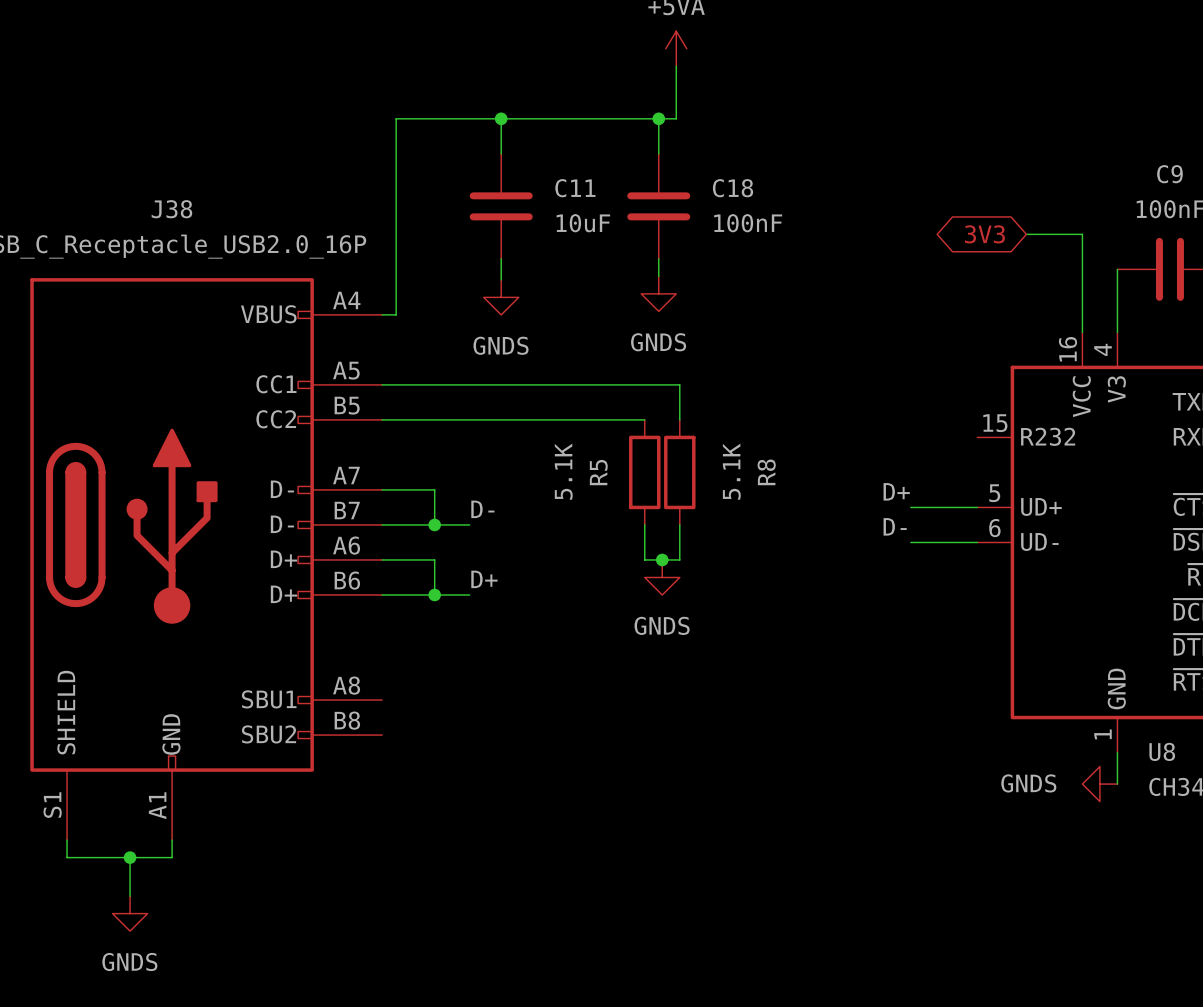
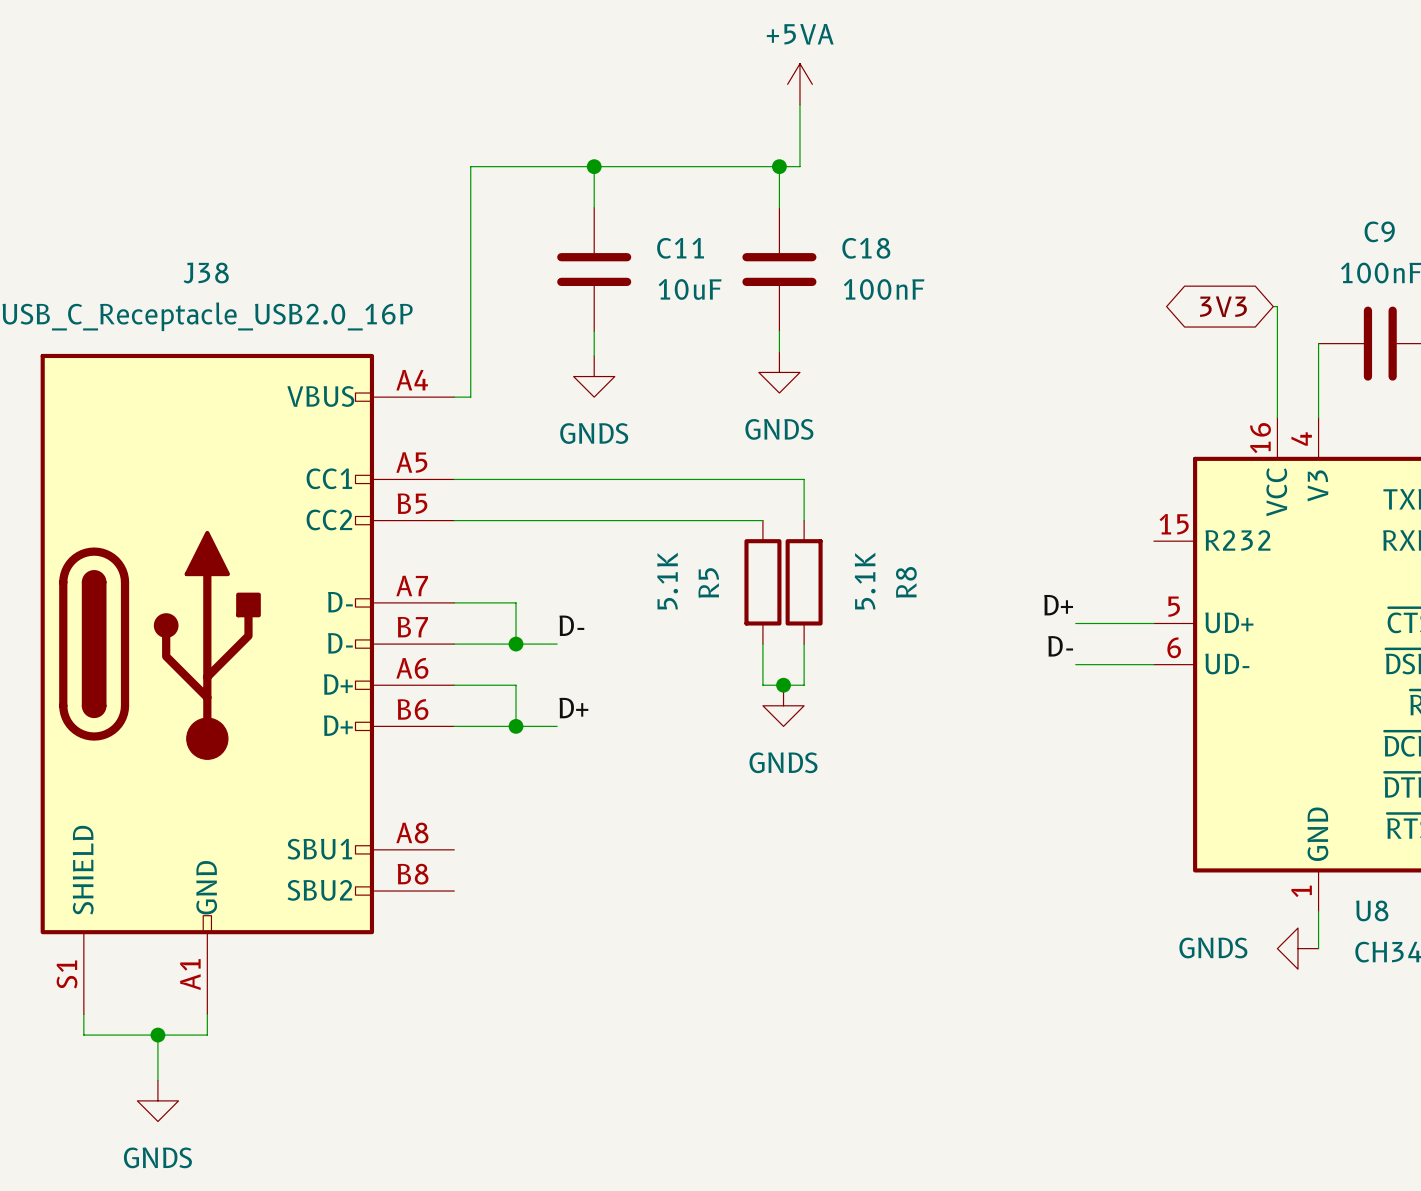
global label position: 3V3 (984, 234) -> 3V3 (1223, 306)
wire: (1026, 234) (1082, 234) (1082, 237) -> (1273, 306) (1277, 306)

